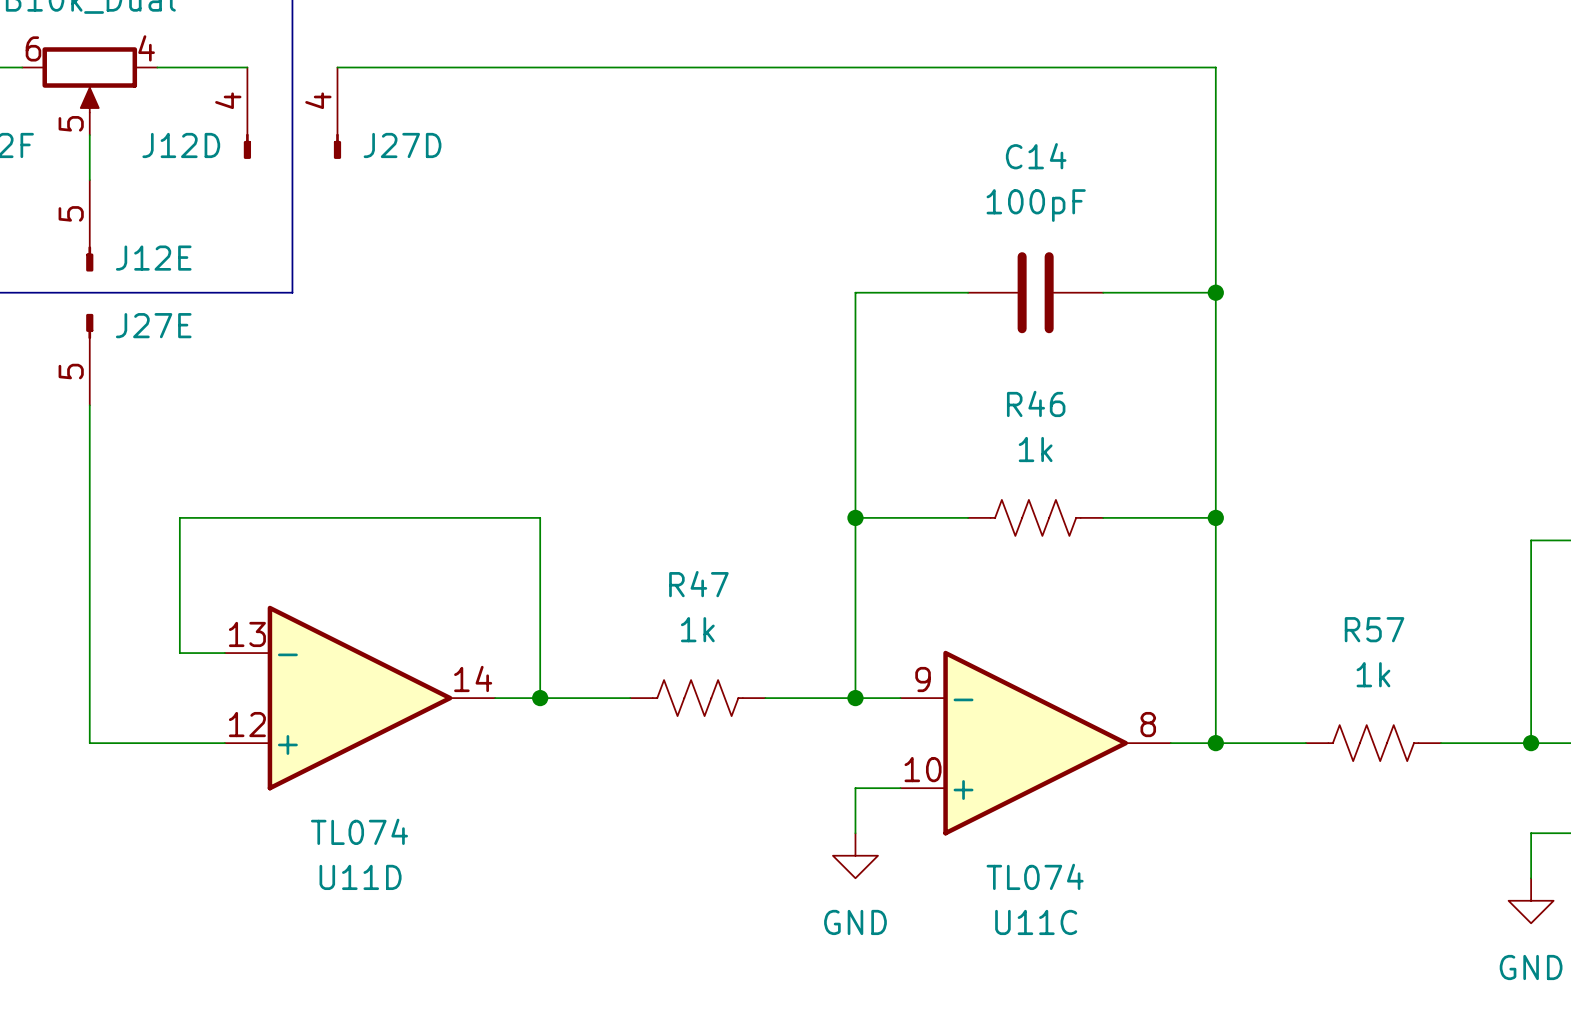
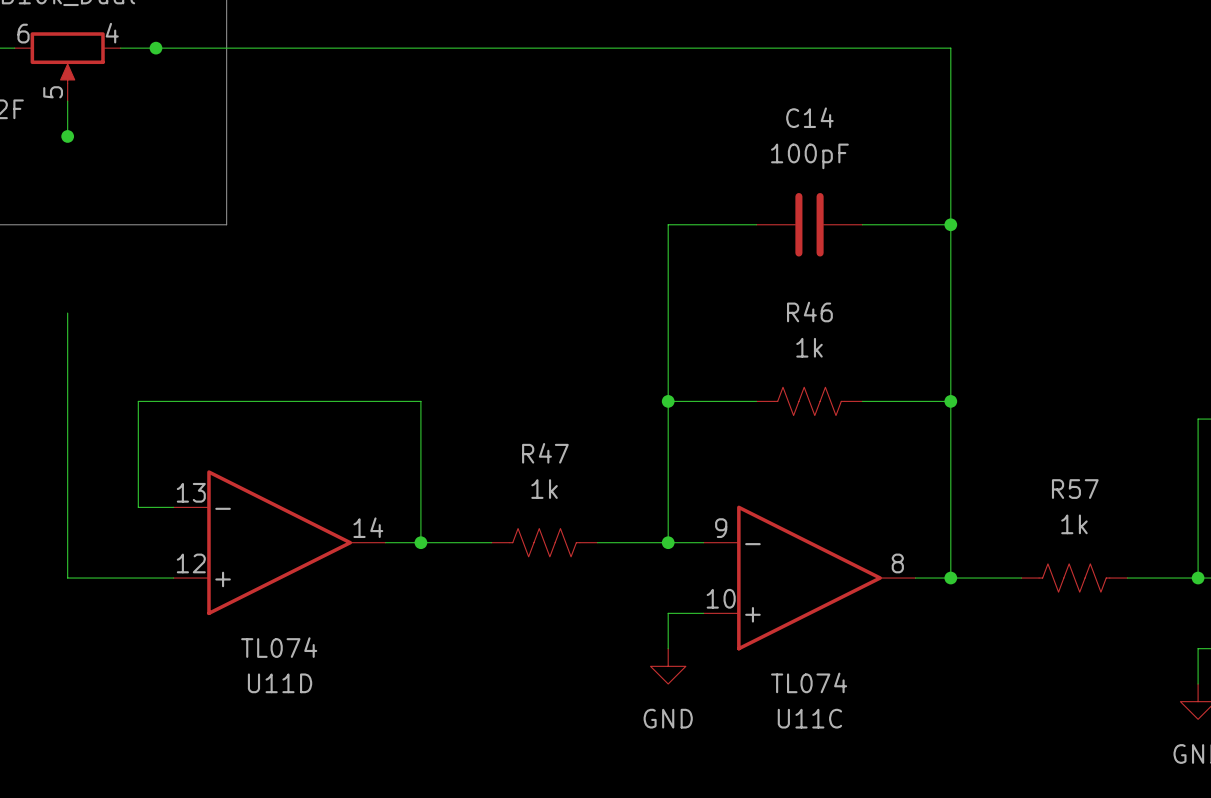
junction: none -> (155, 48)
wire: none -> (191, 48) (261, 48)
J12D: (247, 113) -> none
J27D: (337, 113) -> none
junction: none -> (67, 136)
J12E: (89, 225) -> none
J27E: (89, 359) -> none

